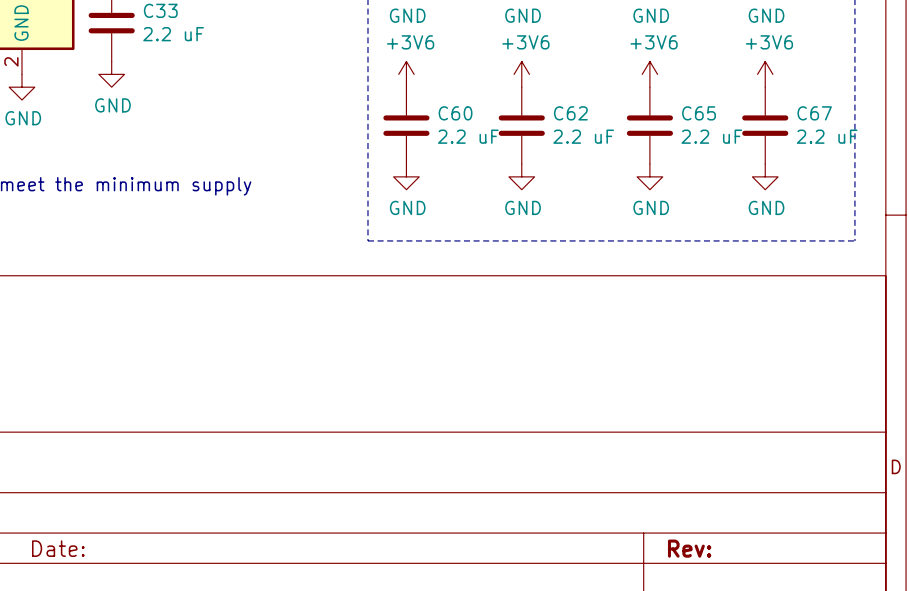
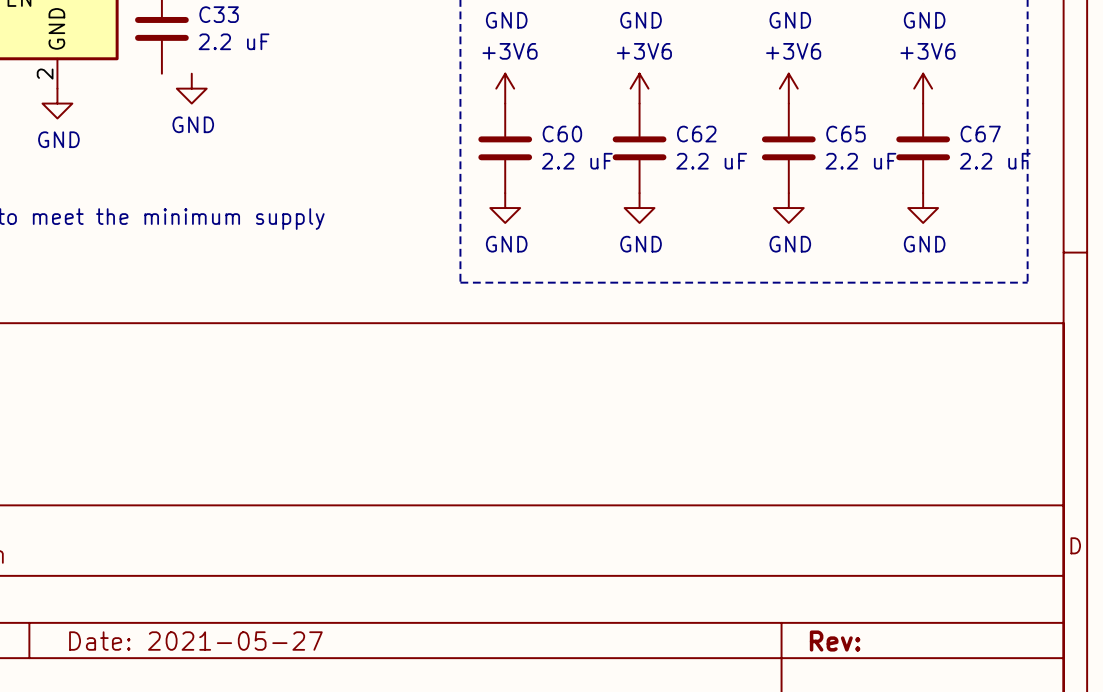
power symbol position: GND (111, 74) -> GND (191, 88)
title block: Date: (58, 548) -> Date: 2021-05-27 (195, 641)

